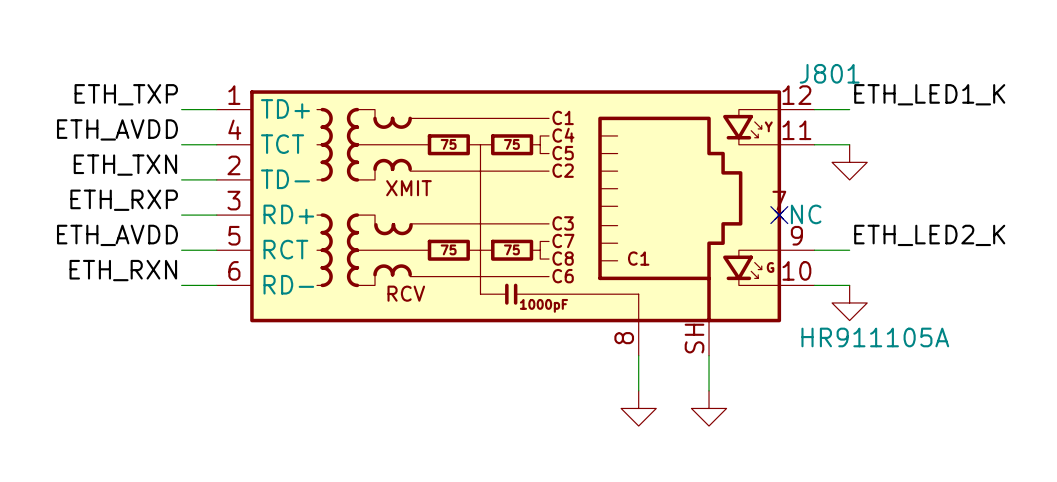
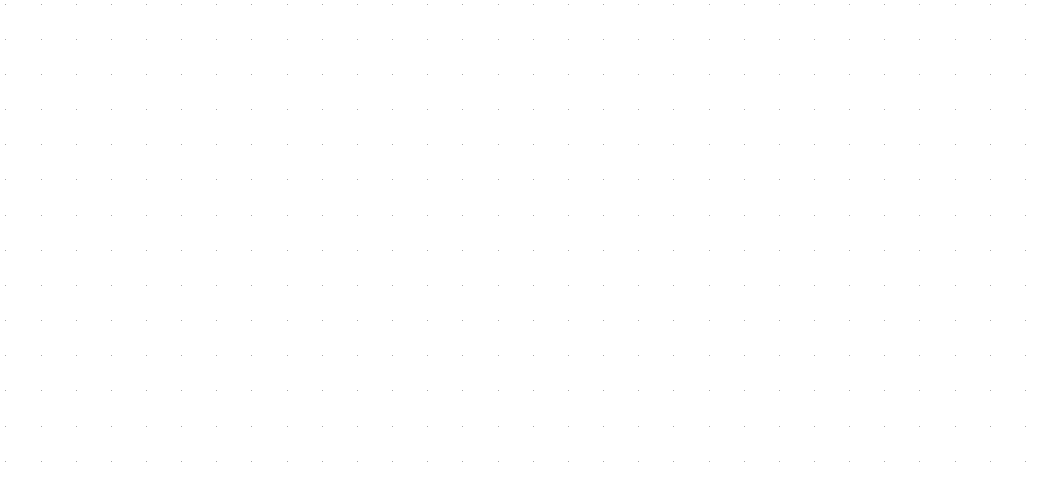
label: ETH_TXP (126, 94) -> none
label: ETH_LED1_K (929, 94) -> none
wire: (181, 109) (216, 109) -> none
wire: (814, 109) (849, 109) -> none
label: ETH_AVDD (117, 129) -> none
wire: (181, 144) (216, 144) -> none
wire: (814, 144) (849, 144) -> none
power symbol: (849, 162) -> none
label: ETH_TXN (125, 165) -> none
wire: (181, 179) (216, 179) -> none
label: ETH_RXP (124, 200) -> none
wire: (181, 215) (216, 215) -> none
no-connect mark: (779, 215) -> none
J801: HR911105A (515, 222) -> none
label: ETH_AVDD (117, 235) -> none
label: ETH_LED2_K (929, 235) -> none
wire: (181, 250) (216, 250) -> none
wire: (814, 250) (849, 250) -> none
label: ETH_RXN (123, 270) -> none
wire: (181, 285) (216, 285) -> none
wire: (814, 285) (849, 285) -> none
power symbol: (849, 302) -> none
wire: (638, 355) (638, 390) -> none
wire: (709, 355) (709, 390) -> none
power symbol: (638, 408) -> none
power symbol: (709, 408) -> none

